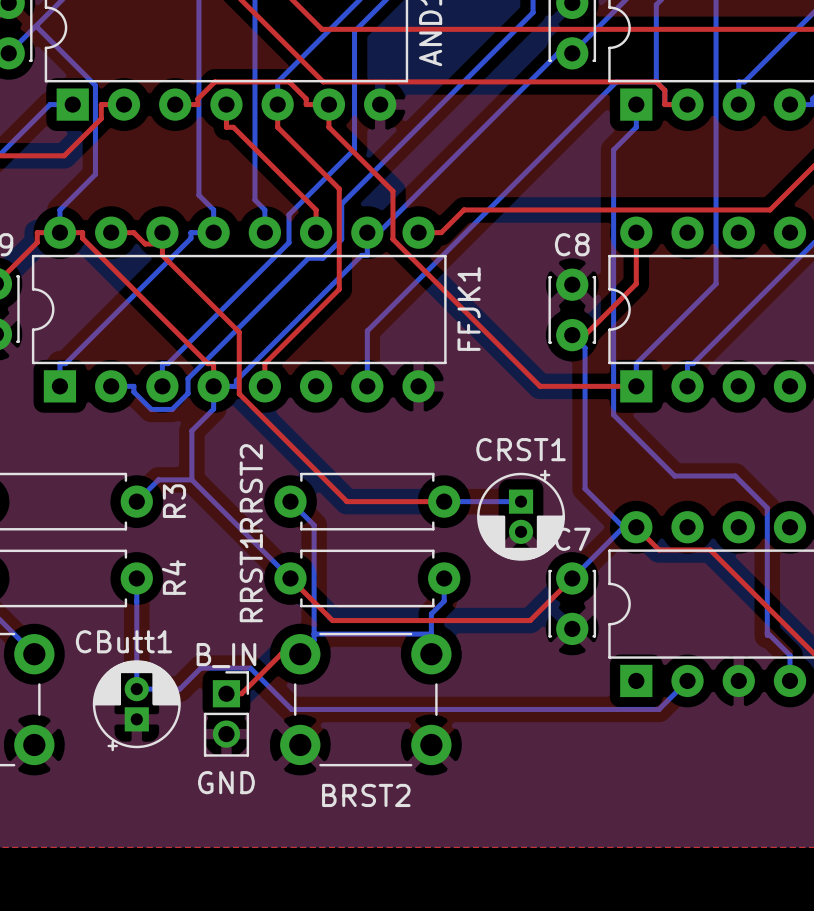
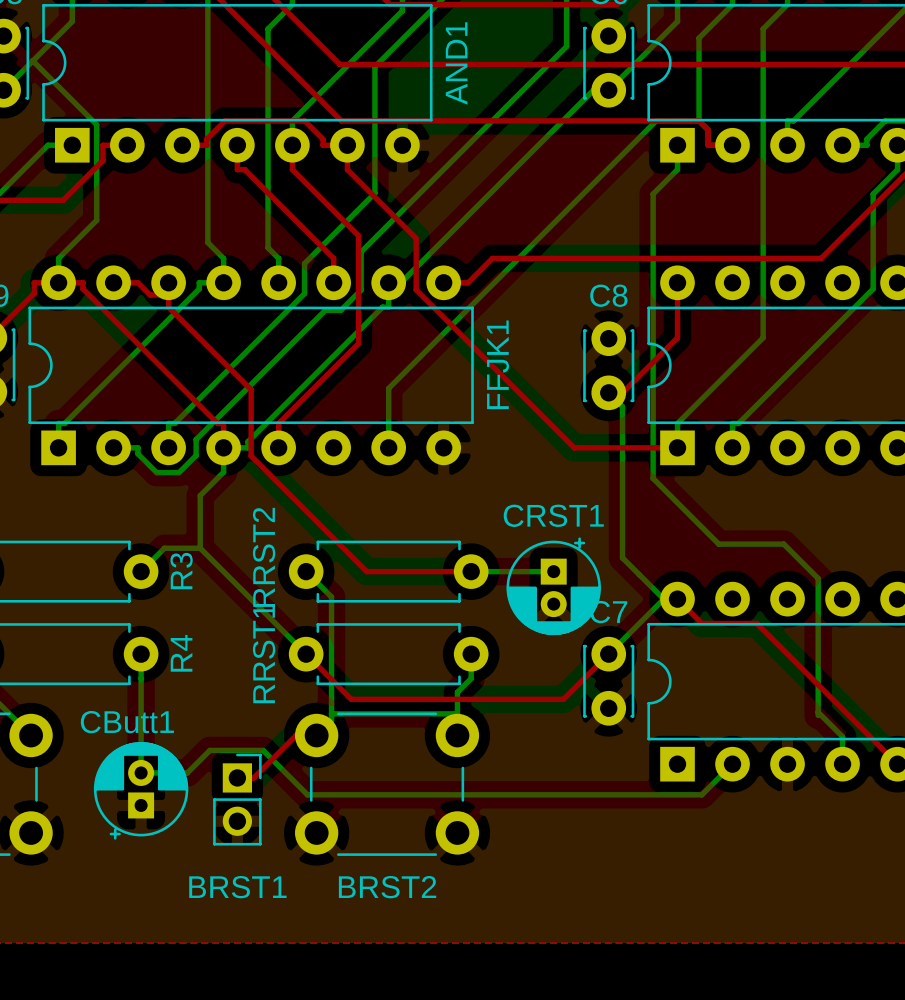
text: B_IN (226, 655) -> none
GND name: GND (226, 782) -> BRST1 (237, 887)

